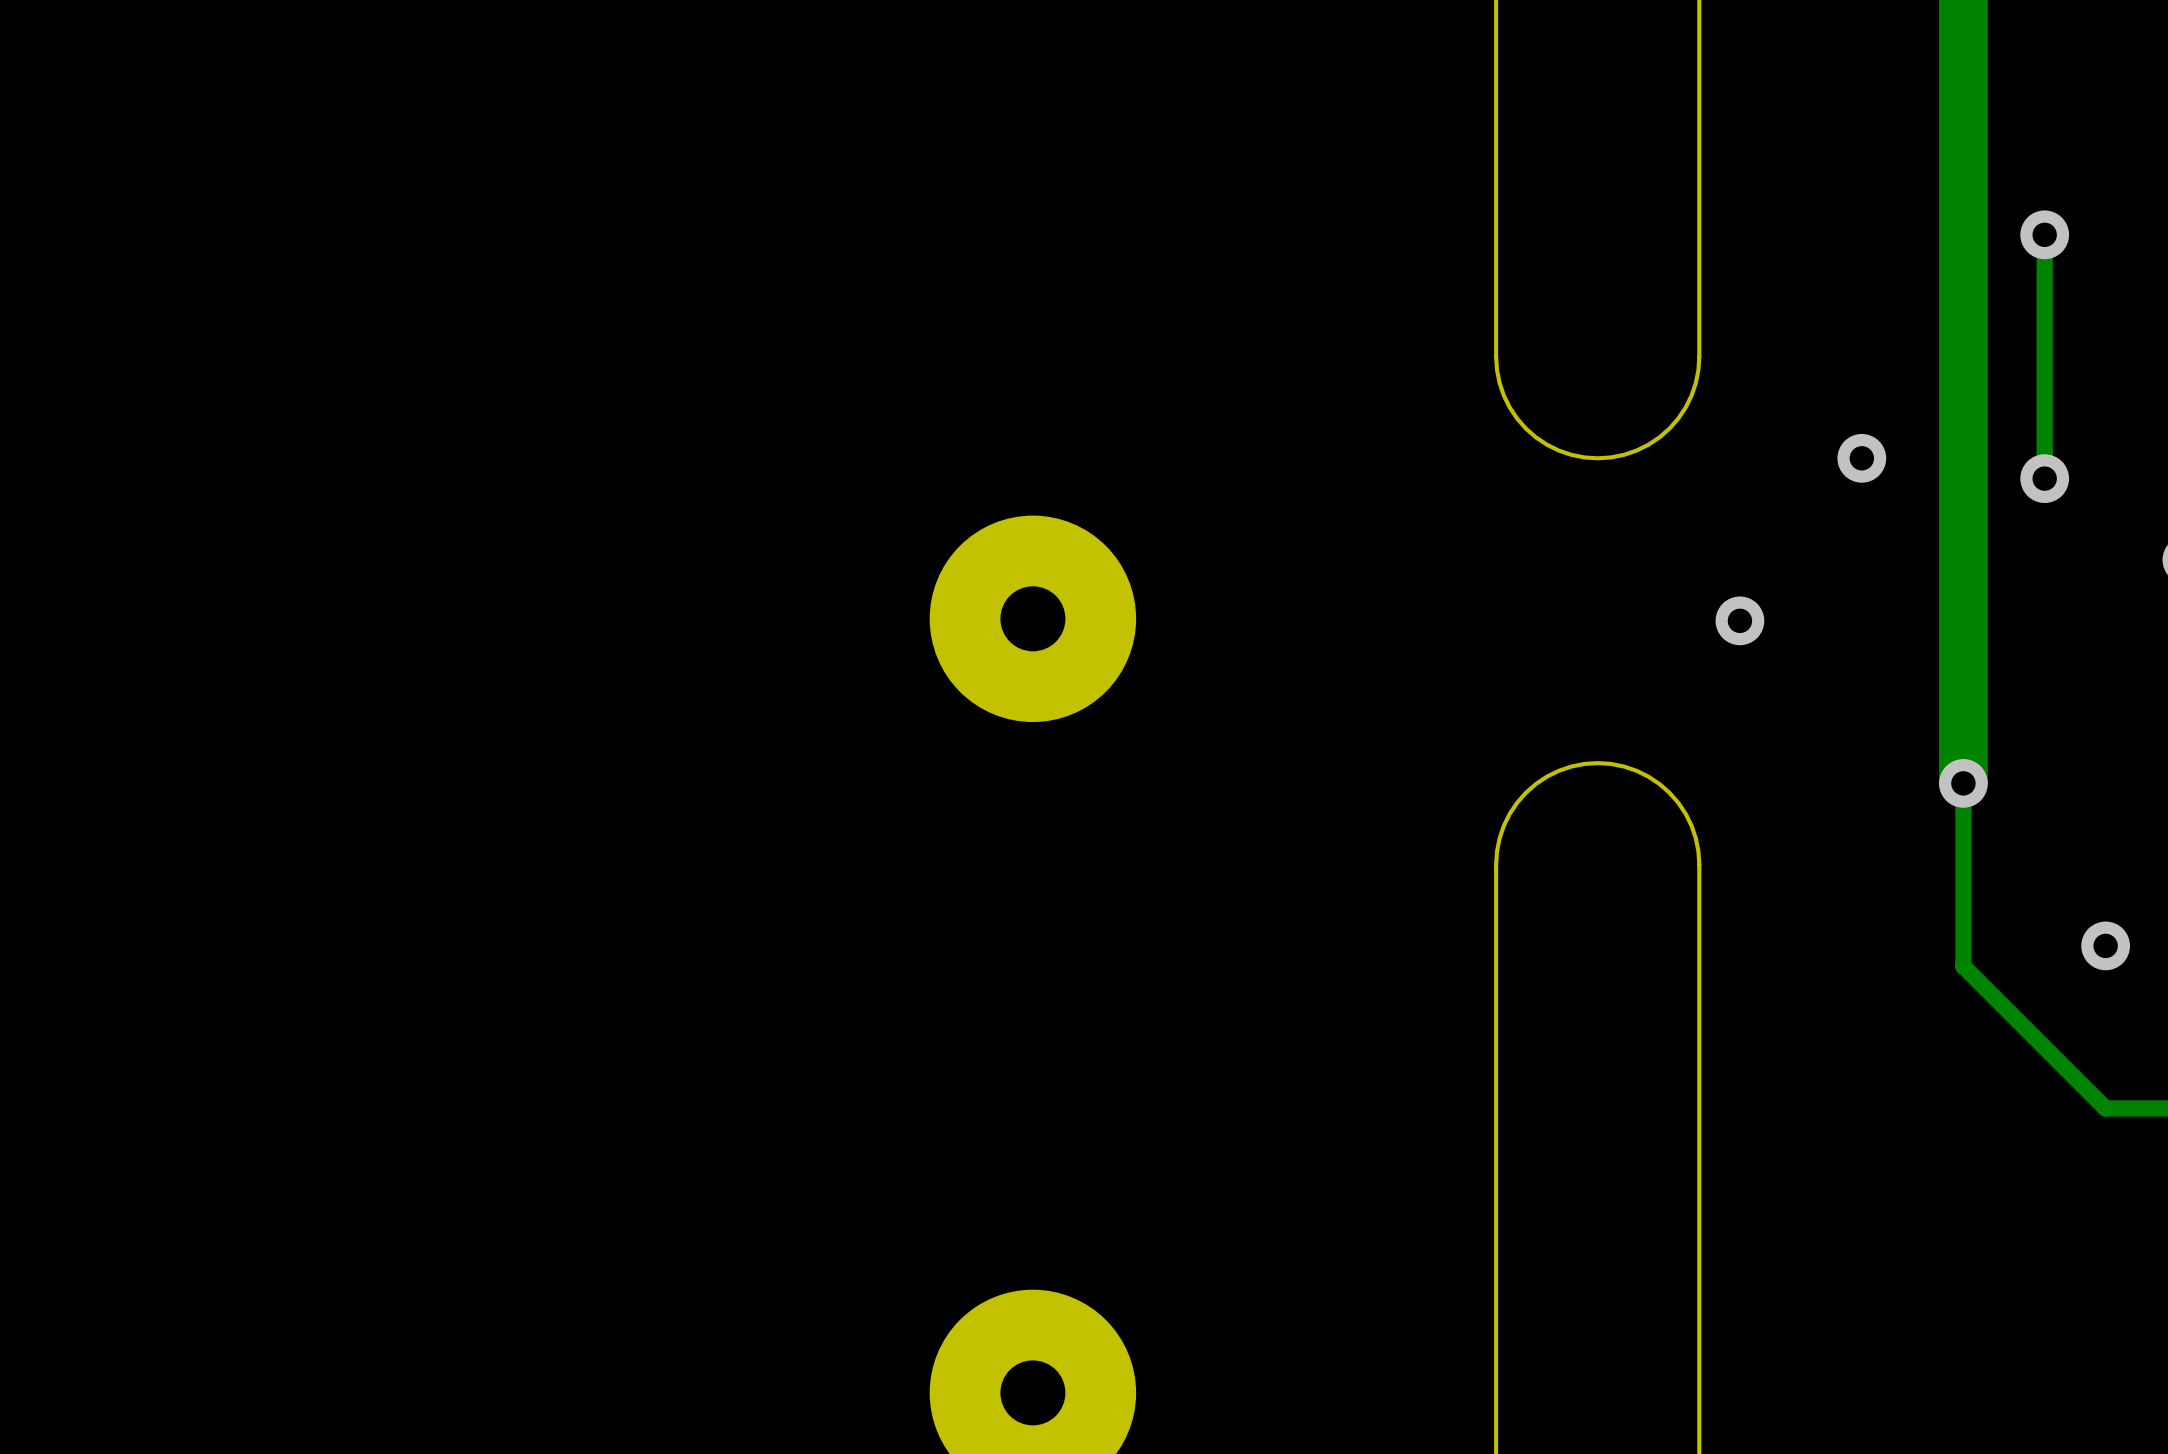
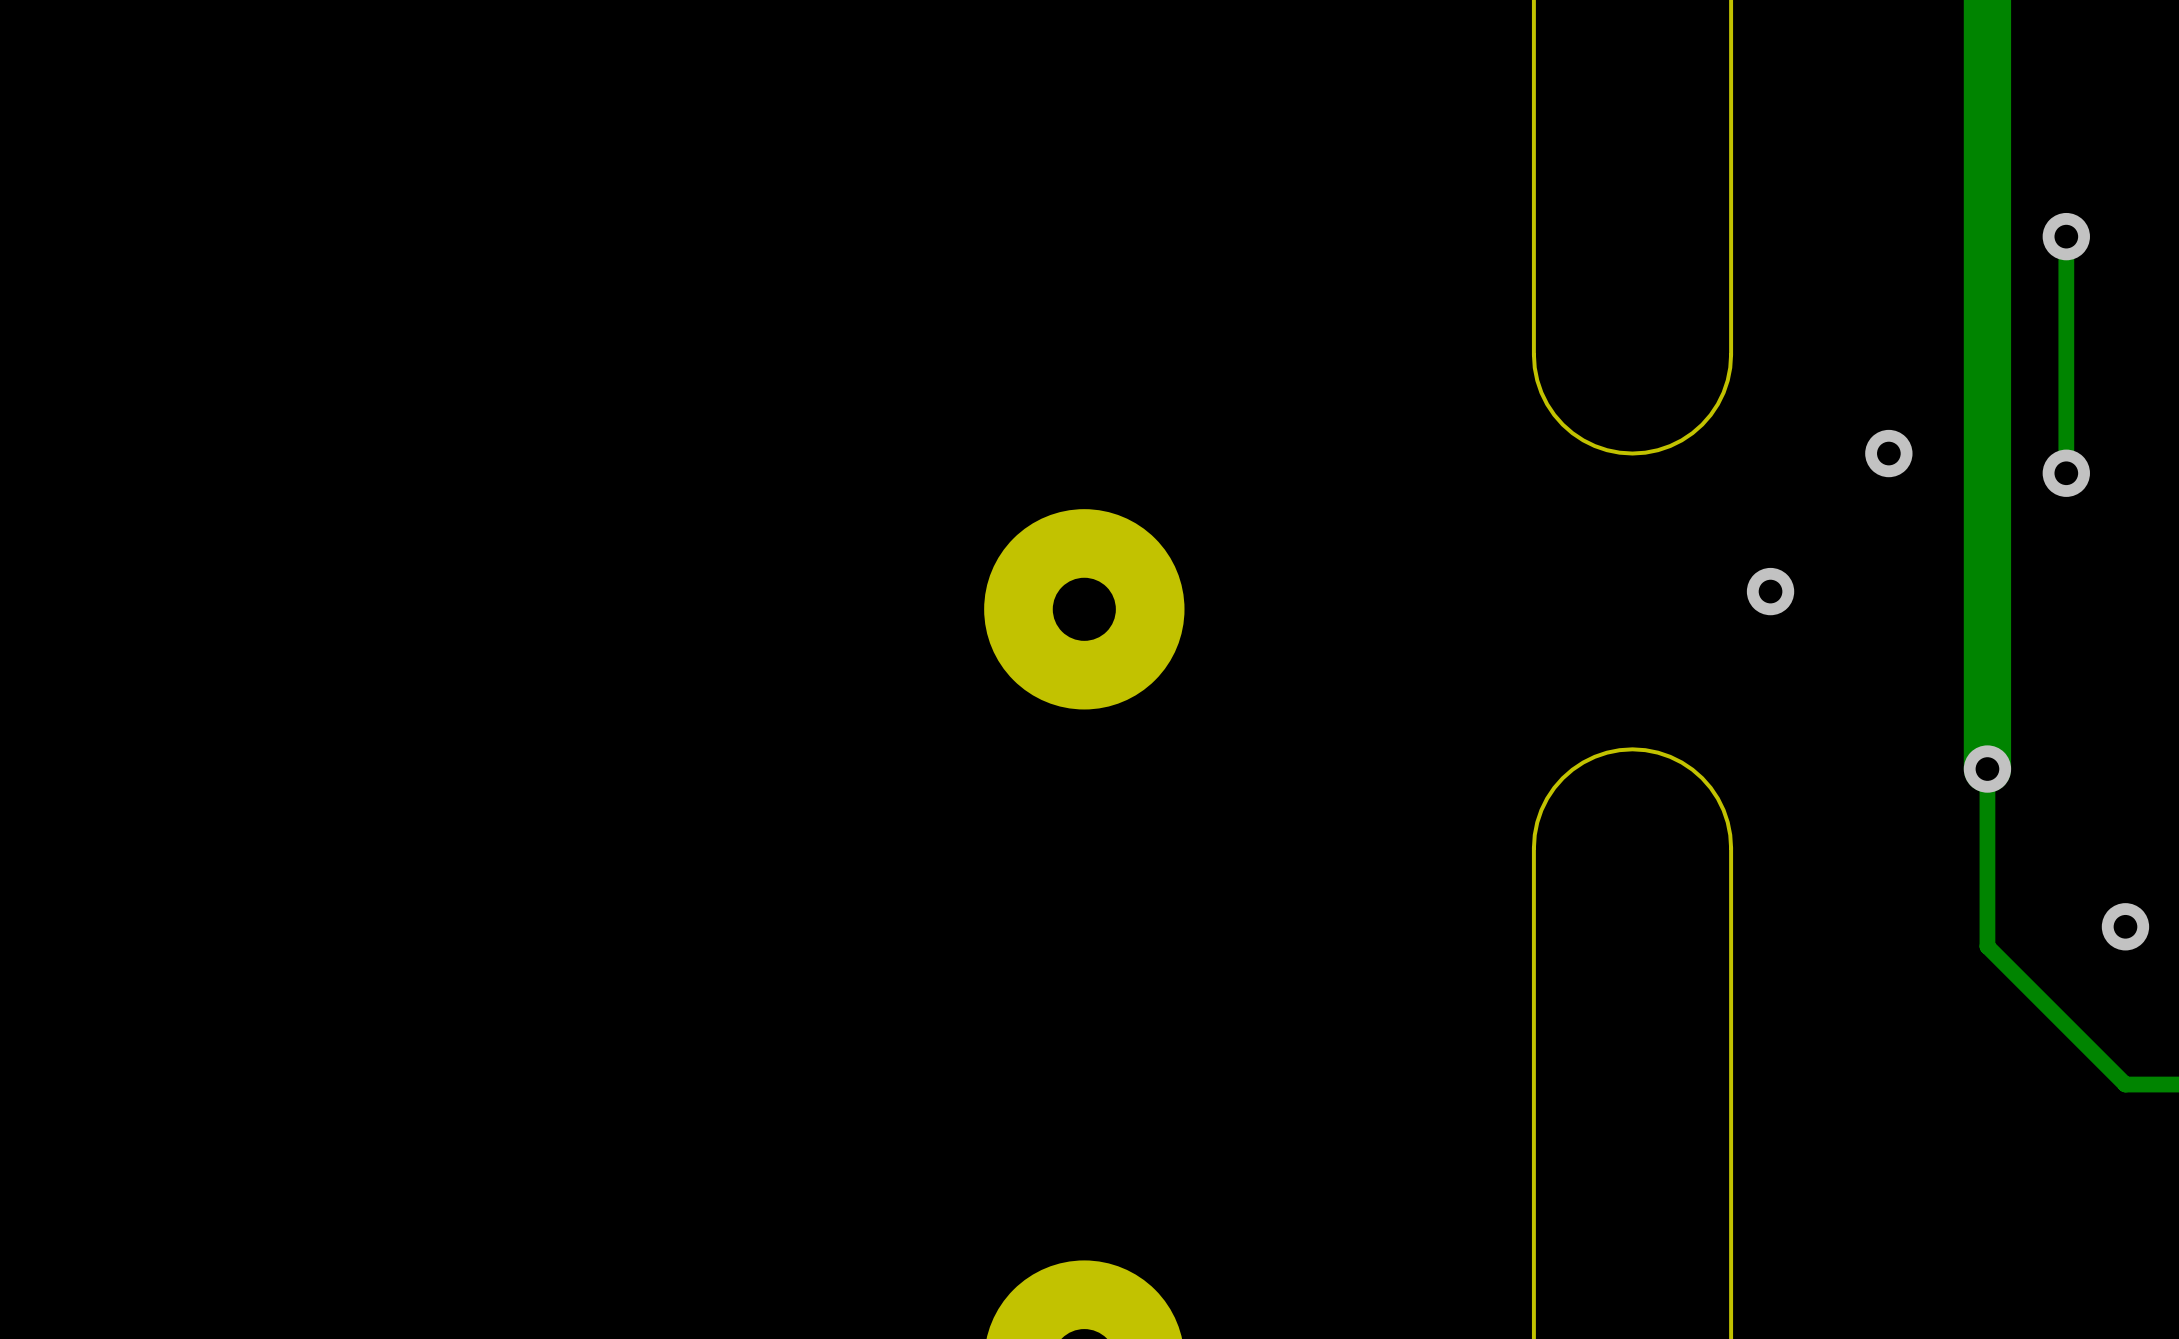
via position: (1739, 620) -> (1770, 591)

